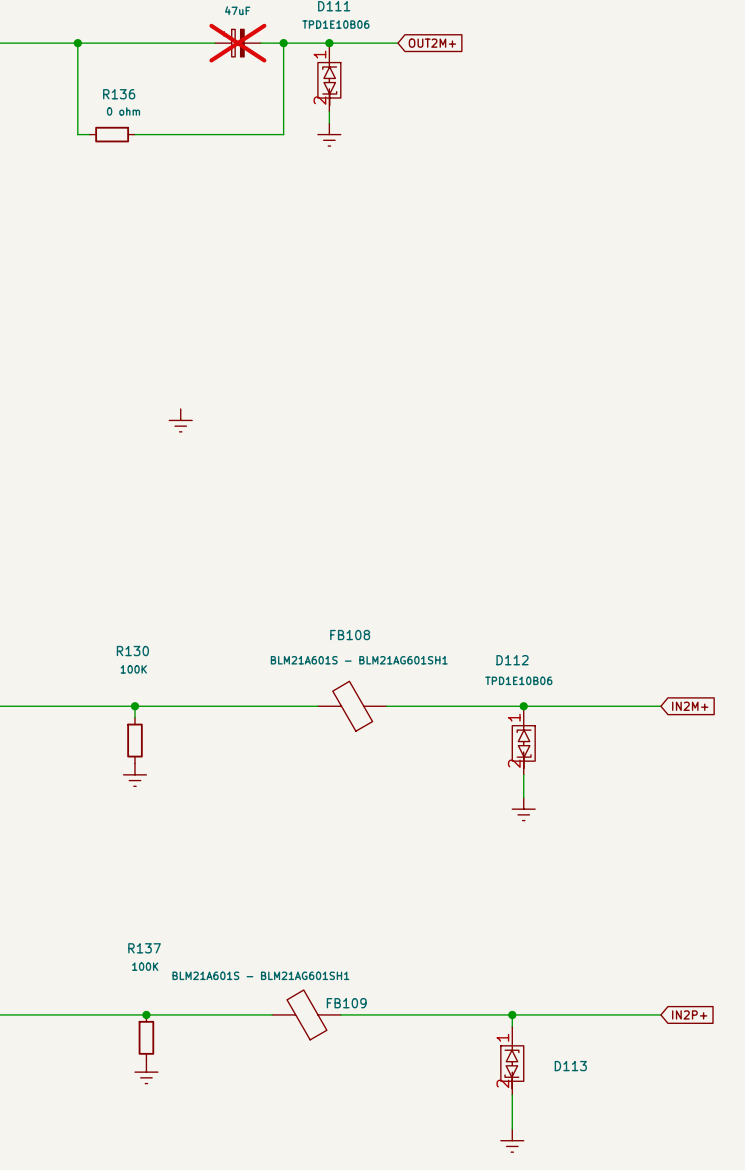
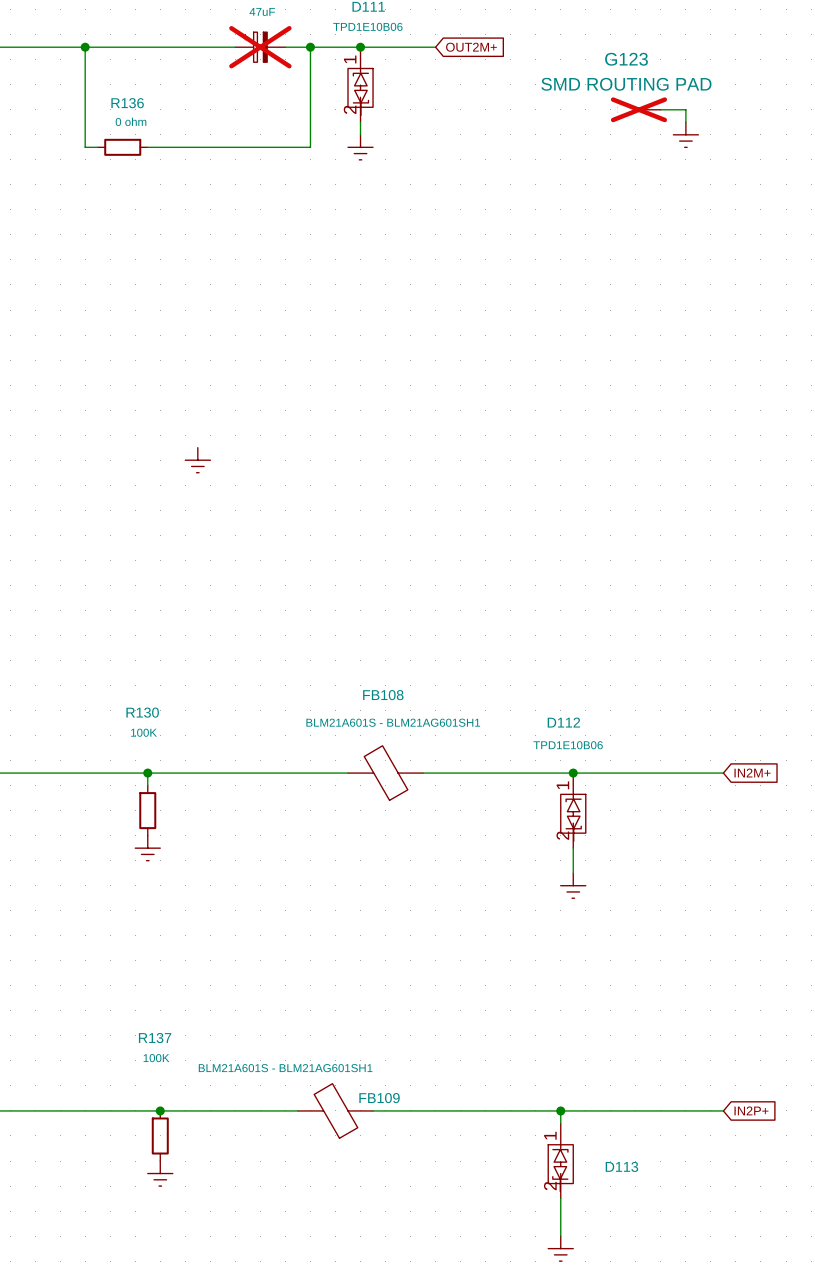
G123: none -> SMD ROUTING PAD (638, 109)
wire: none -> (660, 109) (685, 109) (685, 122)
power symbol: none -> (685, 134)

